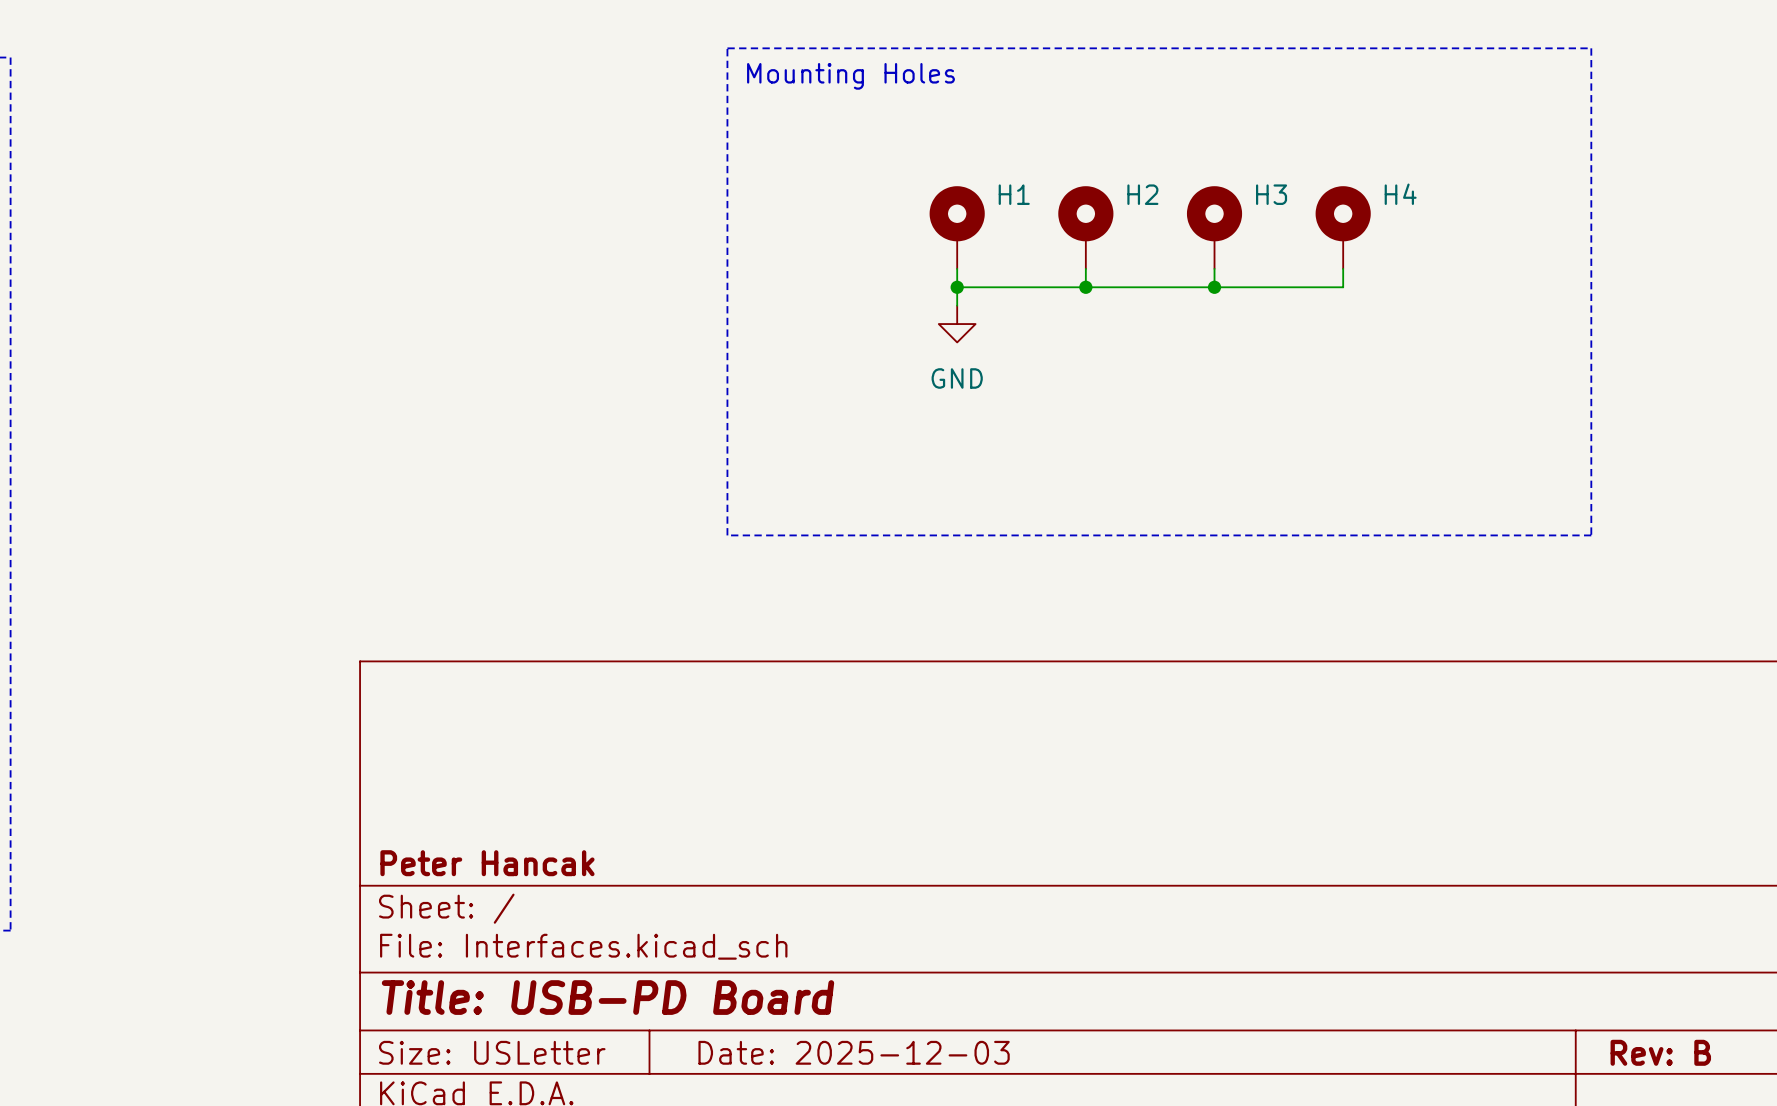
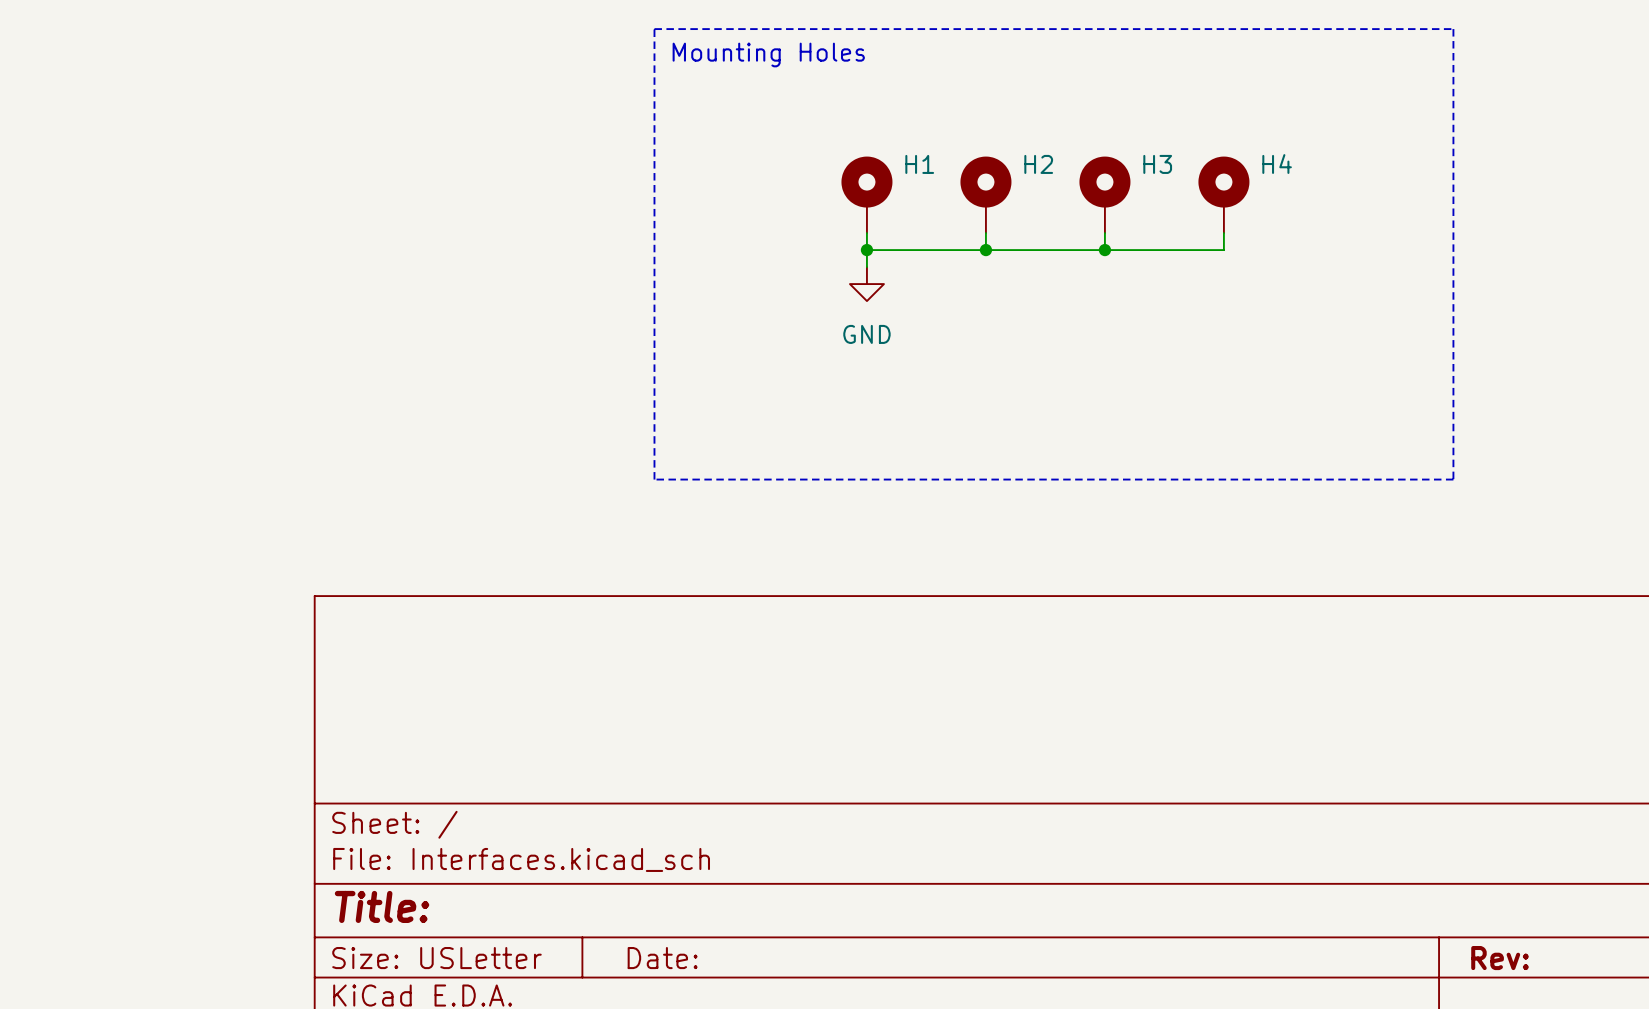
title block: Peter Hancak (487, 863) -> none
title block: Title: USB-PD Board (607, 997) -> Title: (382, 906)
title block: Date: 2025-12-03 (854, 1052) -> Date: (662, 958)
title block: Rev: B (1660, 1052) -> Rev: (1500, 958)

